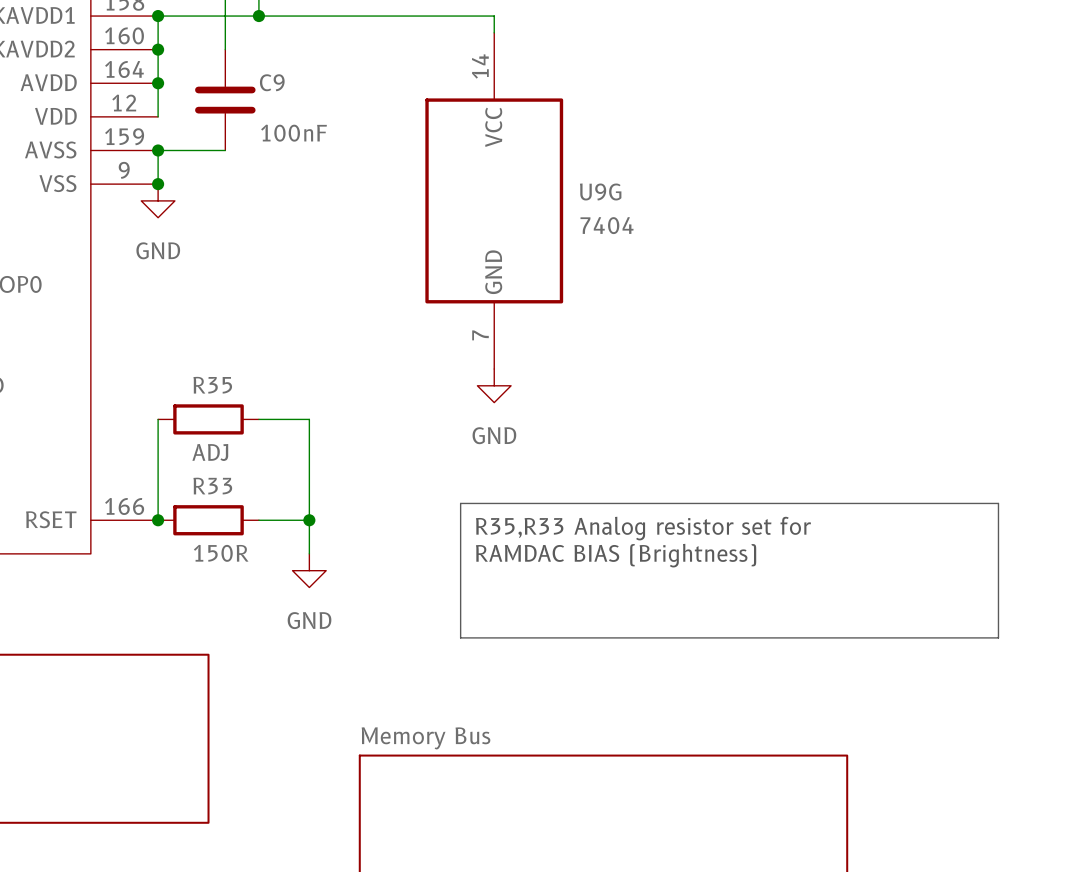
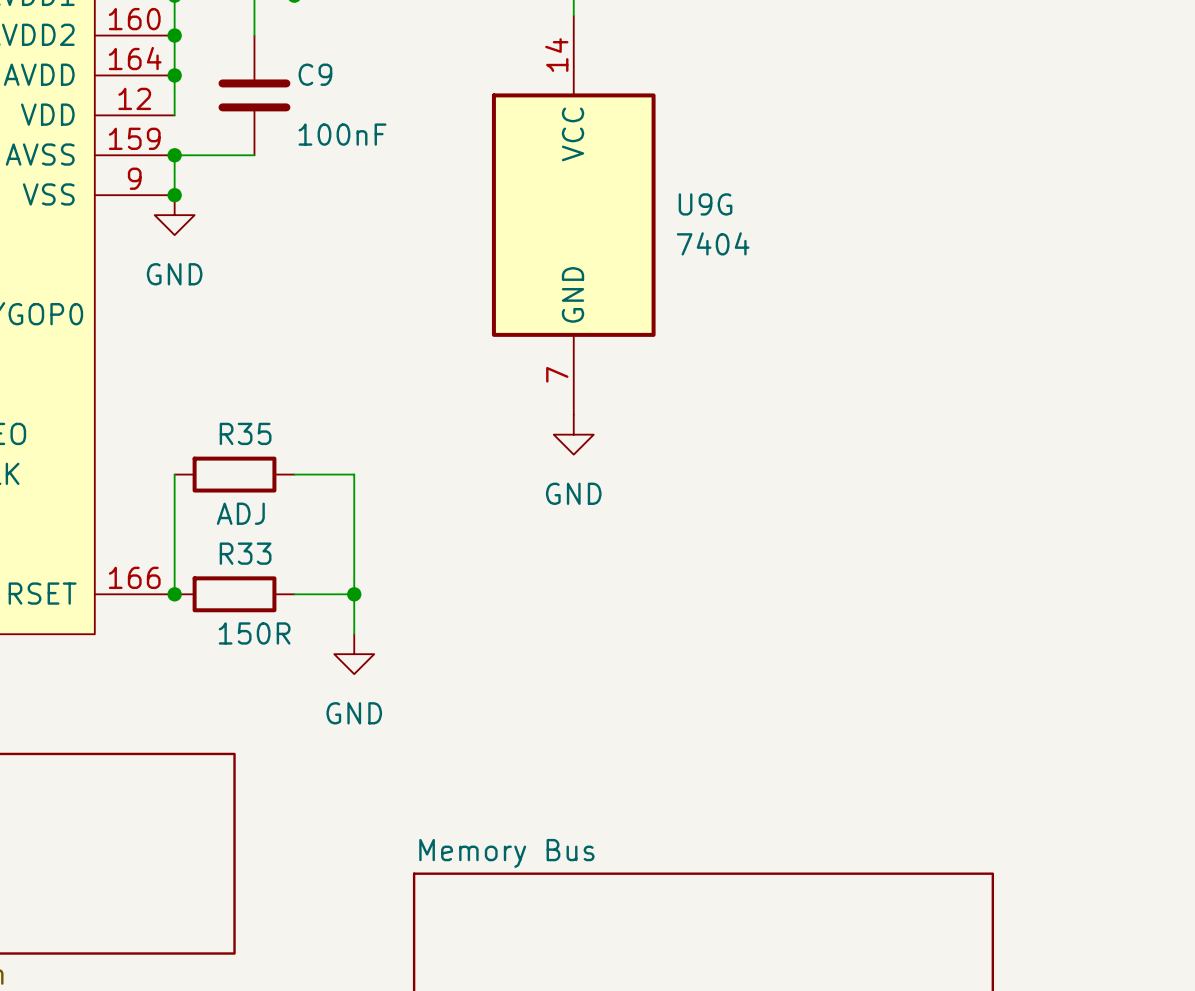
line: (460, 503) (998, 503) (998, 637) (460, 637) (460, 503) -> none
text: R35,R33 Analog resistor set for (643, 528) -> none
text: RAMDAC BIAS (Brightness) (616, 555) -> none

